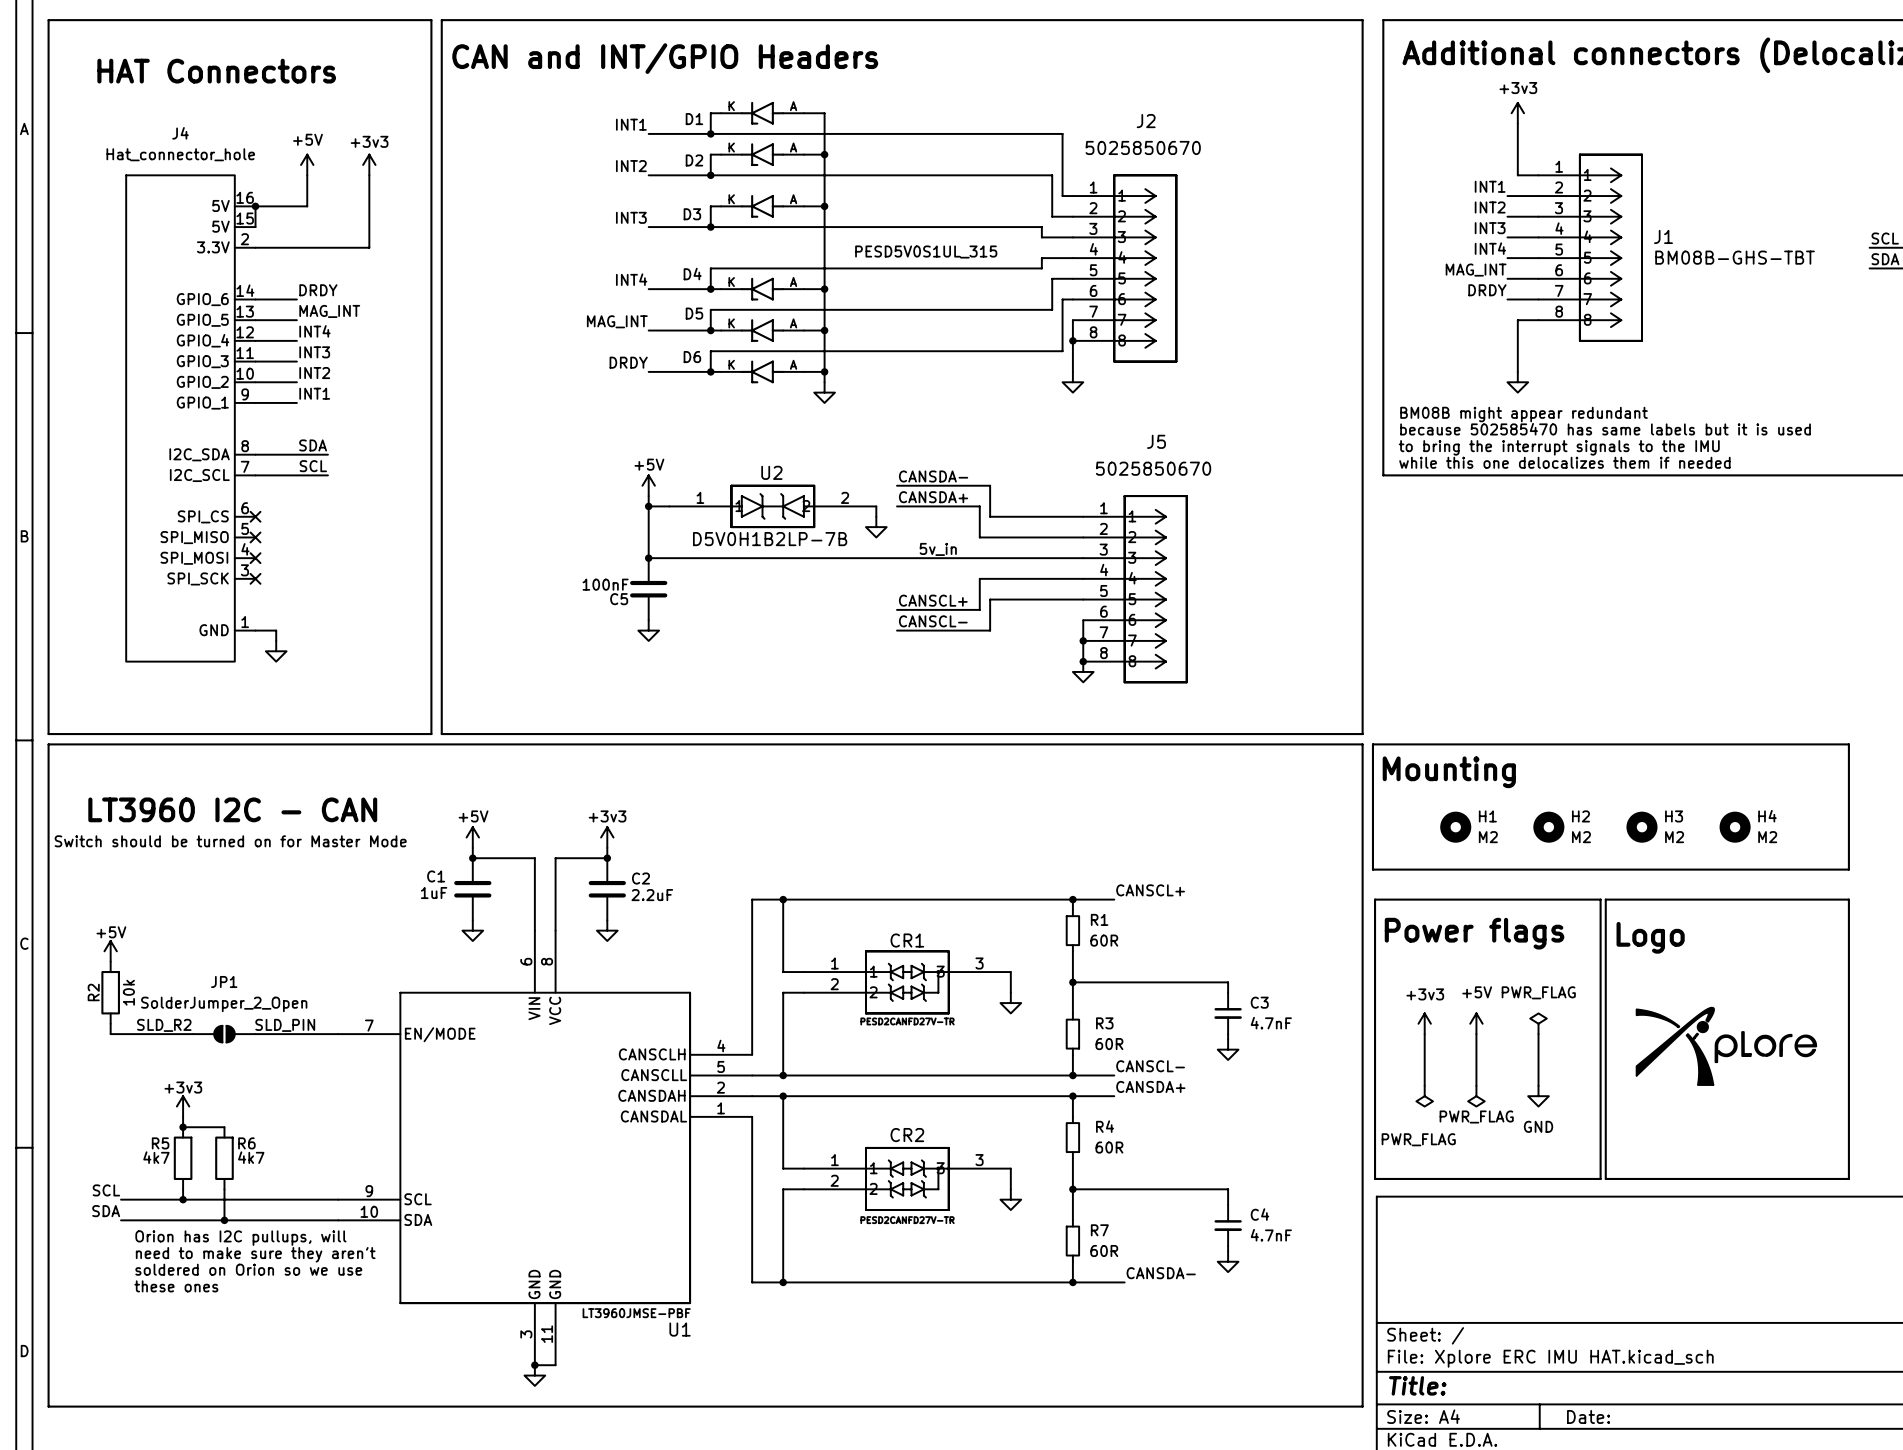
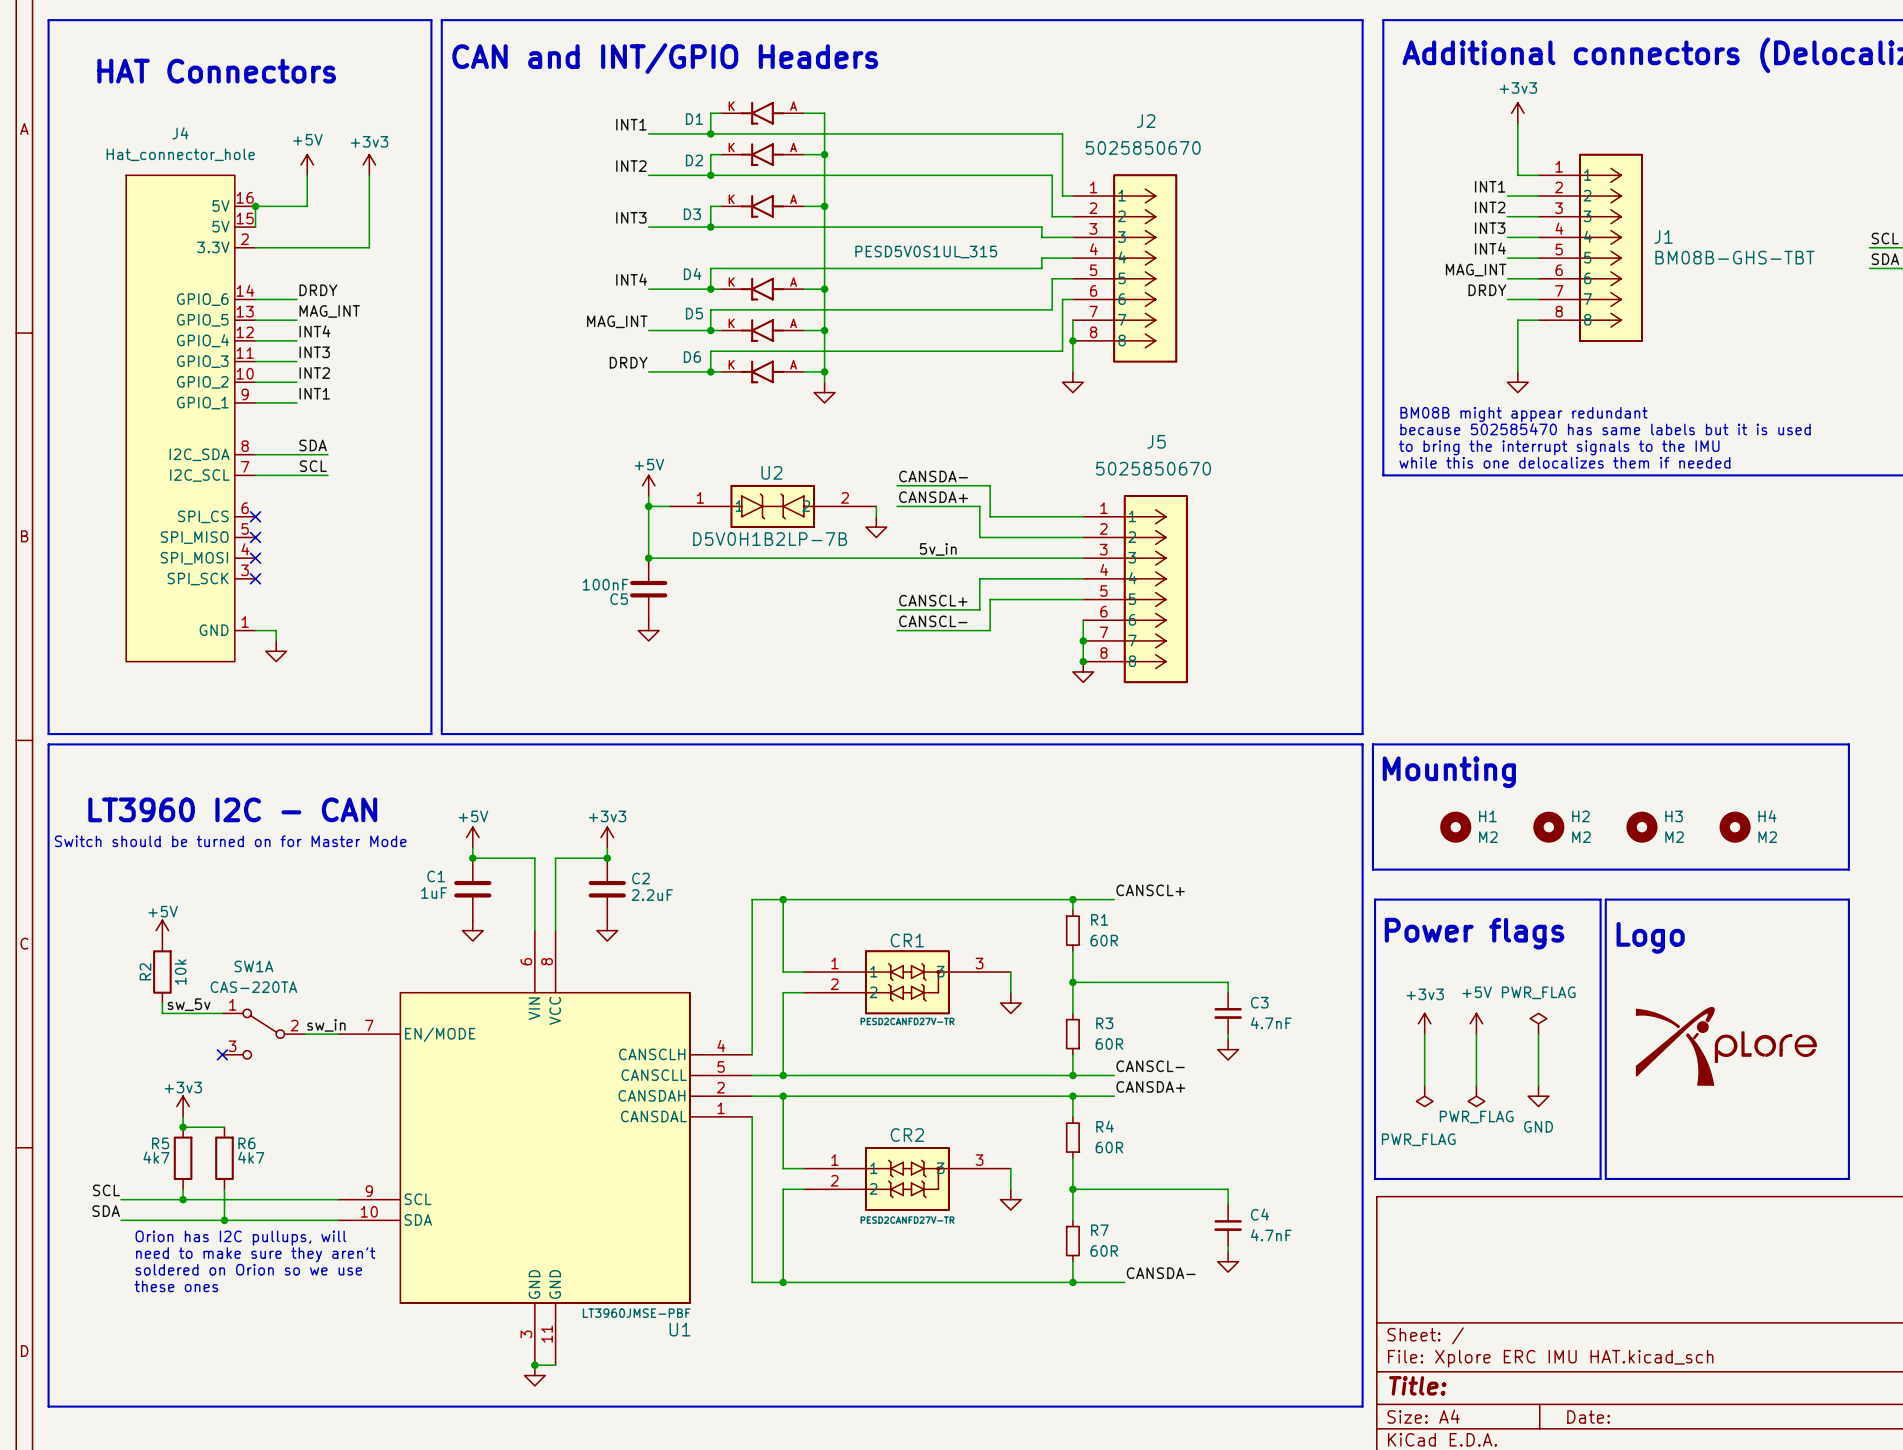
power symbol position: +5V (110, 951) -> +5V (162, 930)
R2 position: (110, 992) -> (162, 972)
wire: none -> (162, 1003) (162, 1013) (222, 1013)
label: none -> sw_5v (189, 1004)
wire: (110, 1023) (110, 1034) (193, 1034) -> none
label: SLD_R2 (164, 1025) -> none
label: SLD_PIN (285, 1025) -> none
label: none -> sw_in (326, 1025)
JP1: SolderJumper_2_Open (224, 1034) -> none
wire: (255, 1034) (305, 1034) -> none
SW1A: none -> CAS-220TA (263, 1034)
no-connect mark: none -> (222, 1054)

